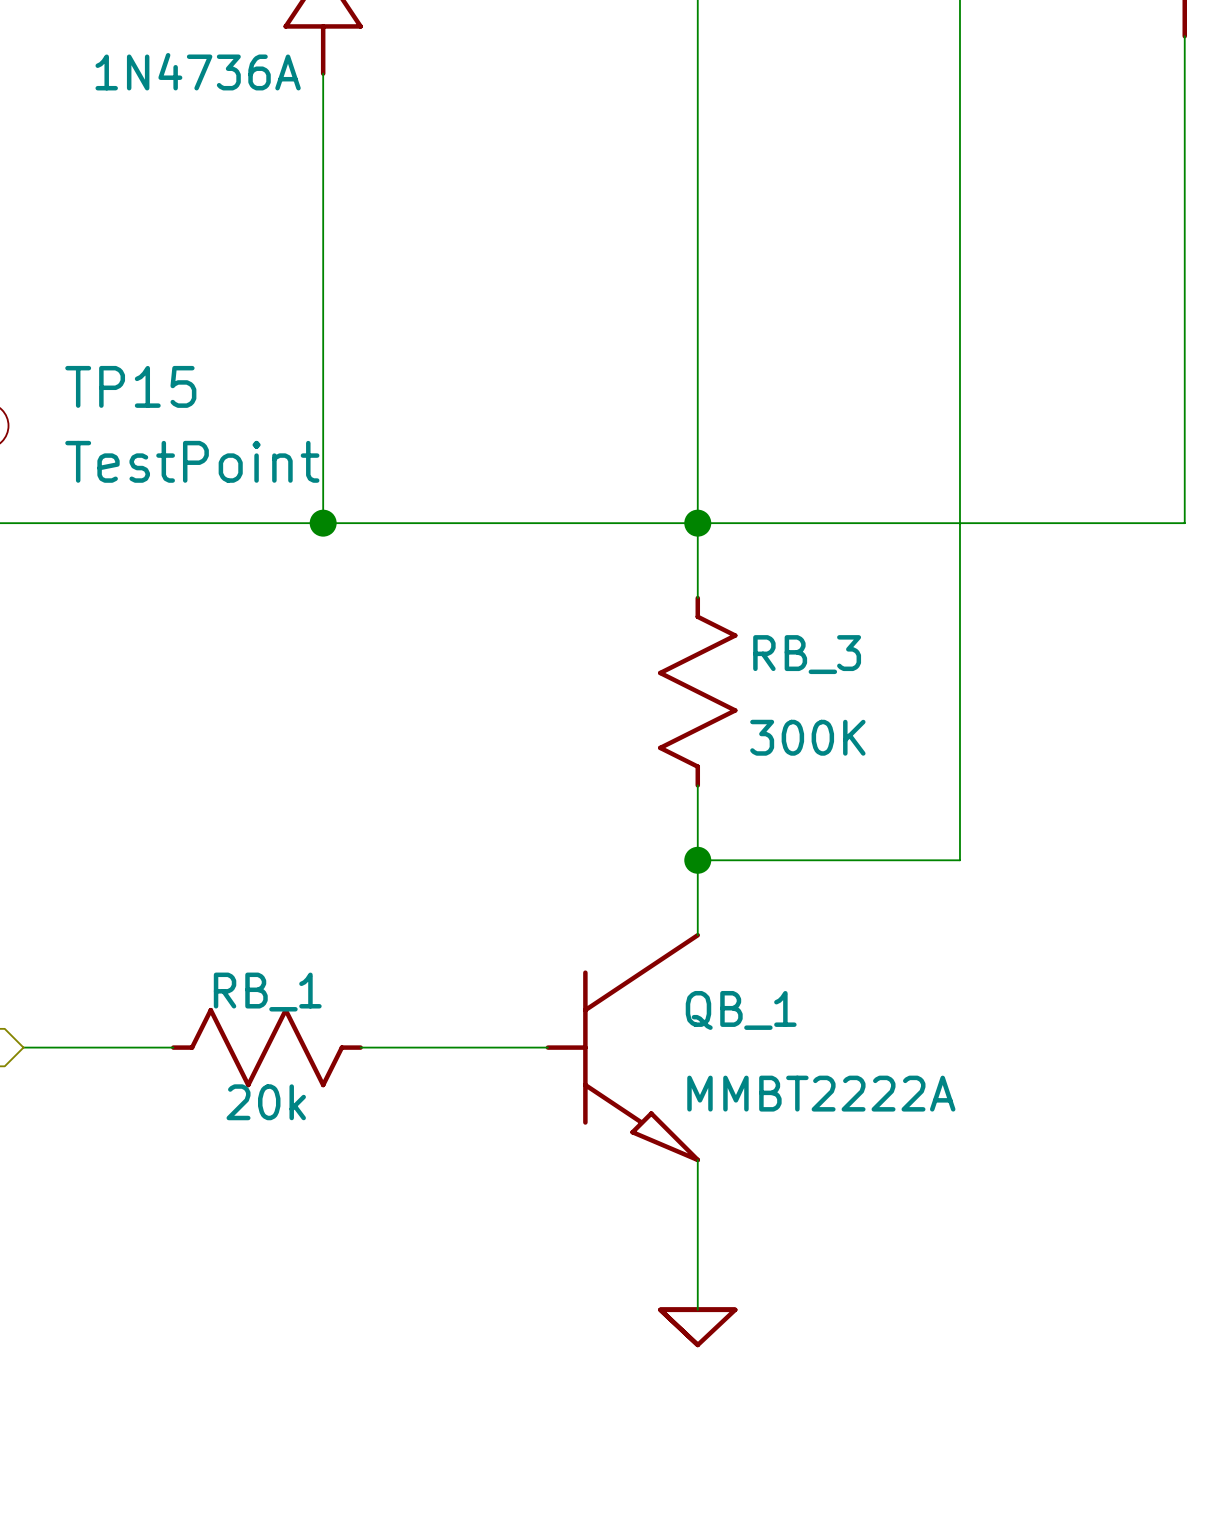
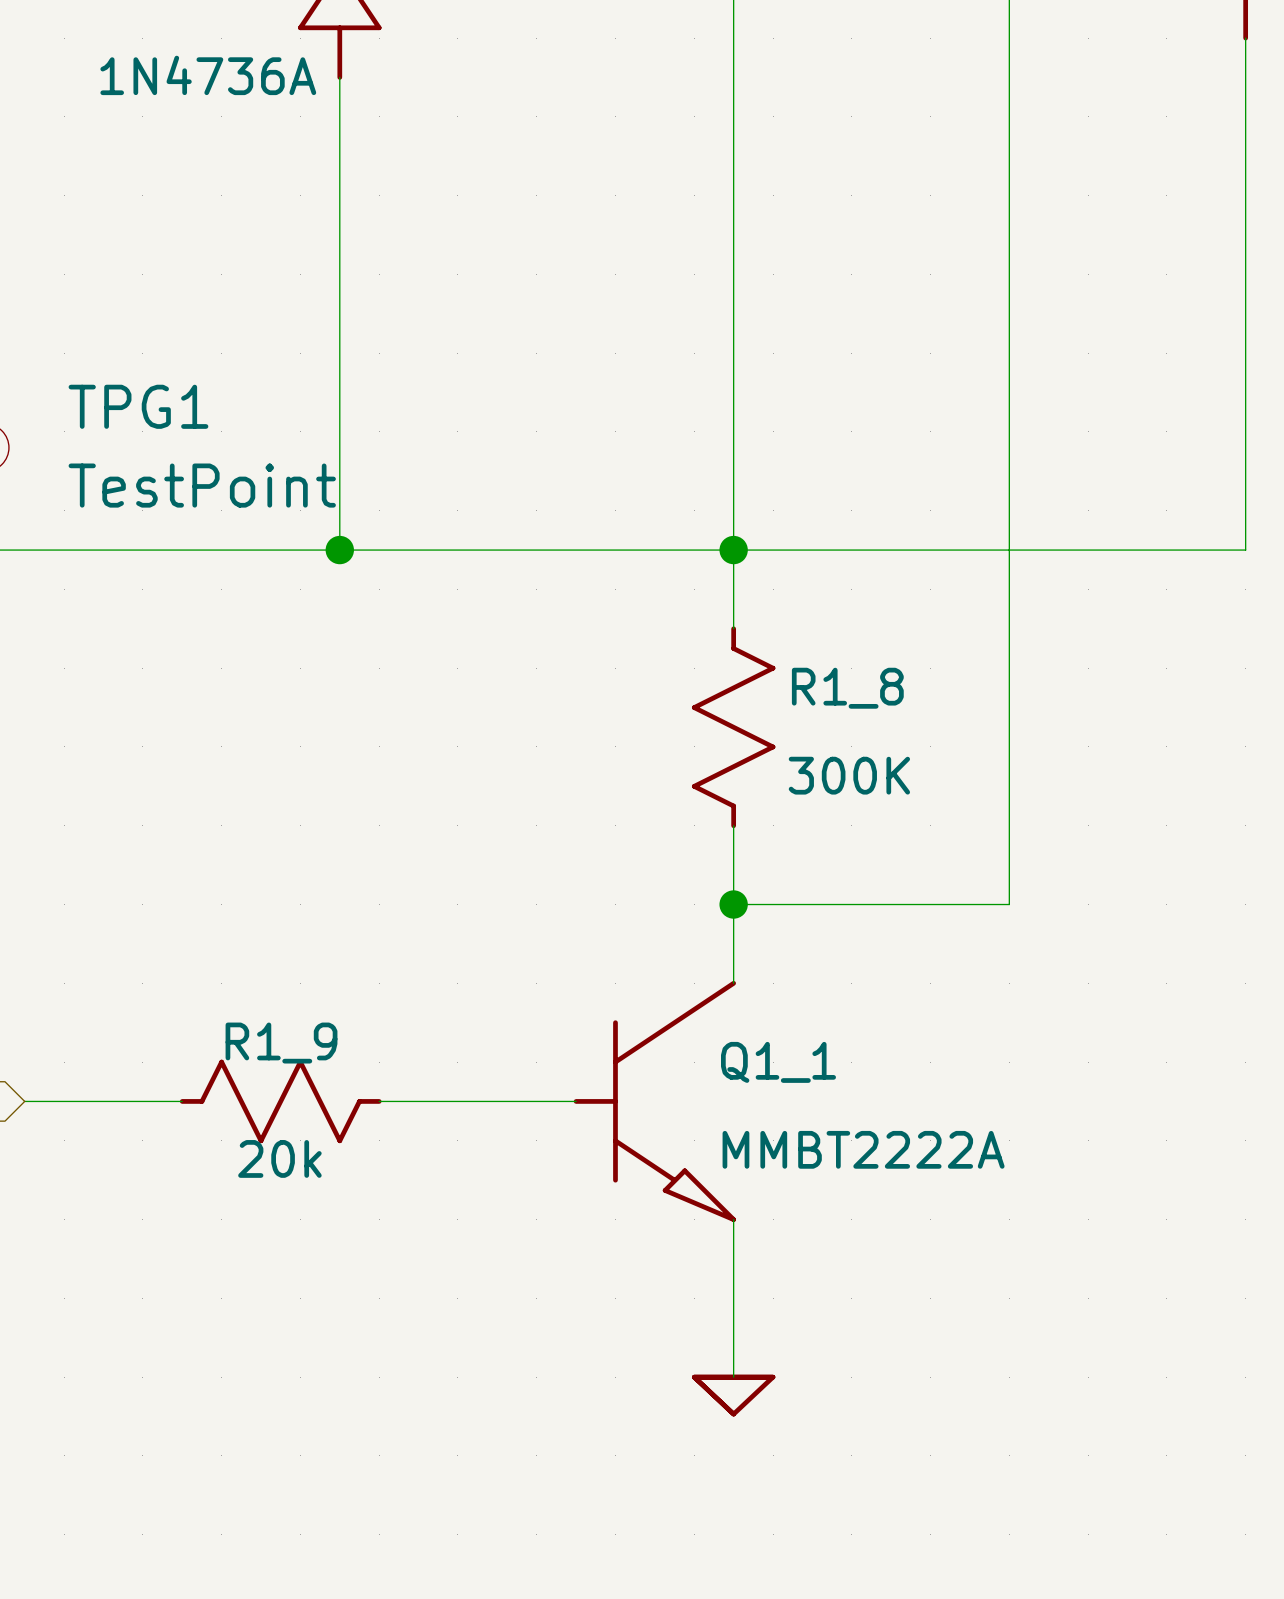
TP15 name: TP15 (130, 386) -> TPG1 (138, 406)
RB_3 name: RB_3 (807, 654) -> R1_8 (847, 688)
RB_1 name: RB_1 (267, 992) -> R1_9 (281, 1043)
QB_1 name: QB_1 (741, 1010) -> Q1_1 (778, 1062)

